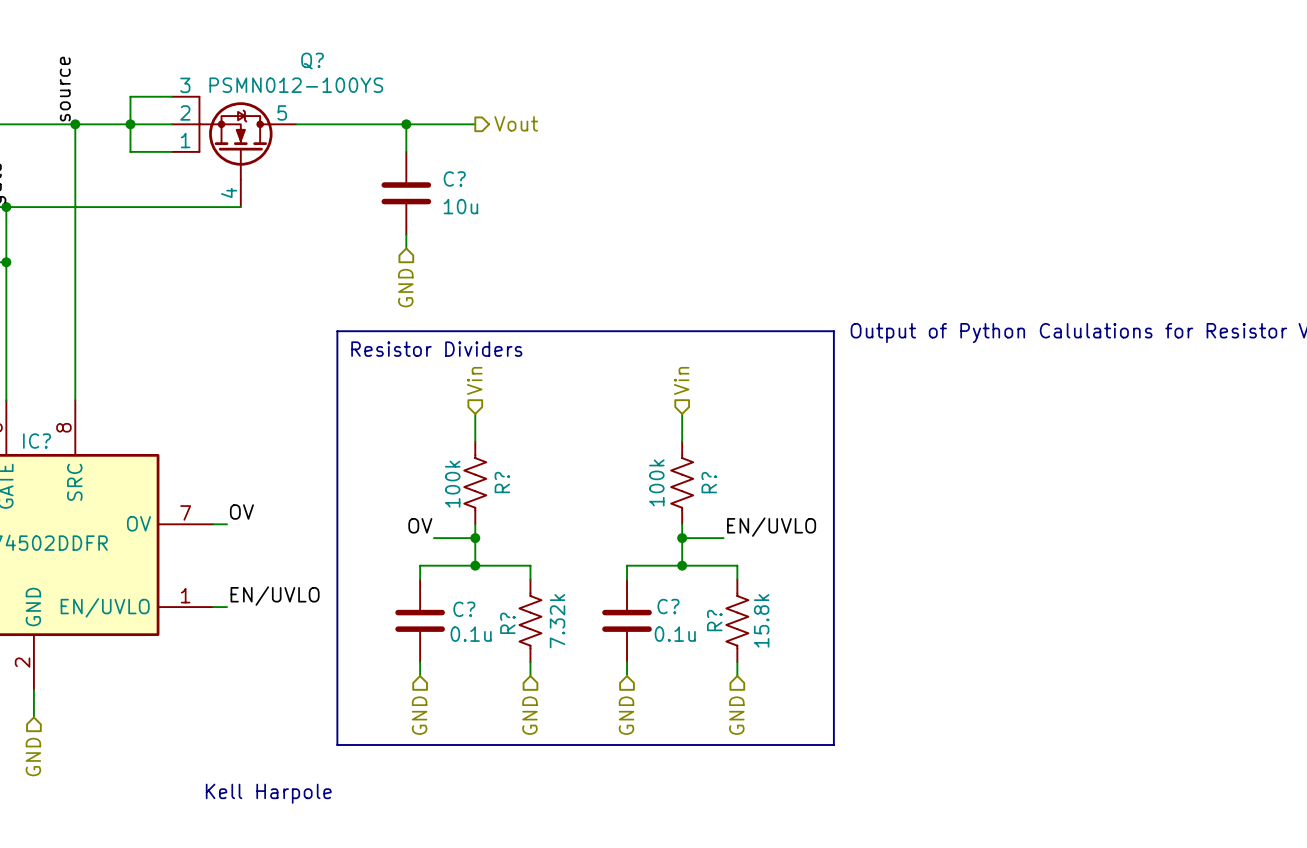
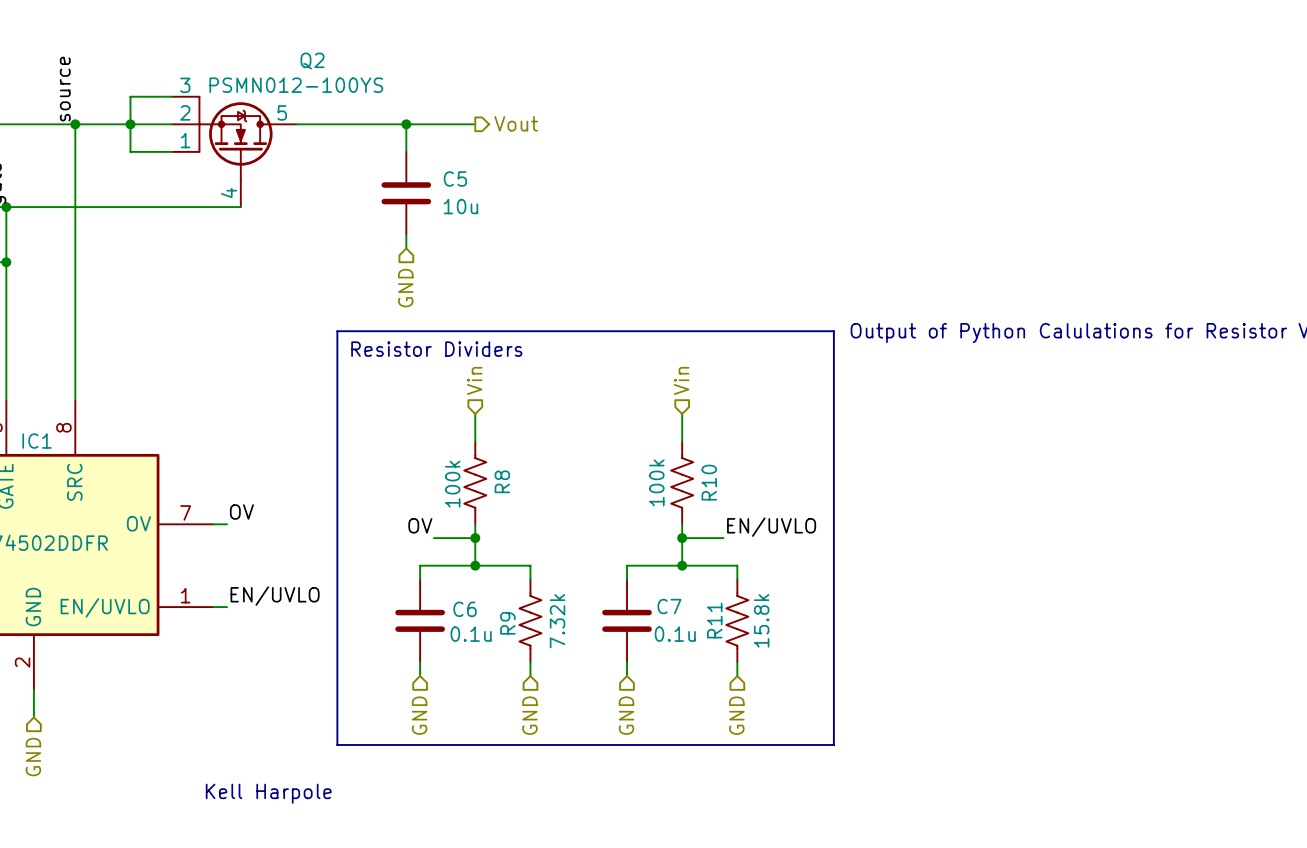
Q? name: Q? (312, 61) -> Q2 (312, 61)
C? name: C? (454, 178) -> C5 (455, 178)
IC? name: IC? (37, 441) -> IC1 (37, 441)
R? name: R? (502, 482) -> R8 (502, 481)
R? name: R? (709, 482) -> R10 (709, 482)
C? name: C? (668, 606) -> C7 (669, 606)
C? name: C? (464, 609) -> C6 (465, 609)
R? name: R? (714, 620) -> R11 (714, 620)
R? name: R? (507, 623) -> R9 (507, 623)

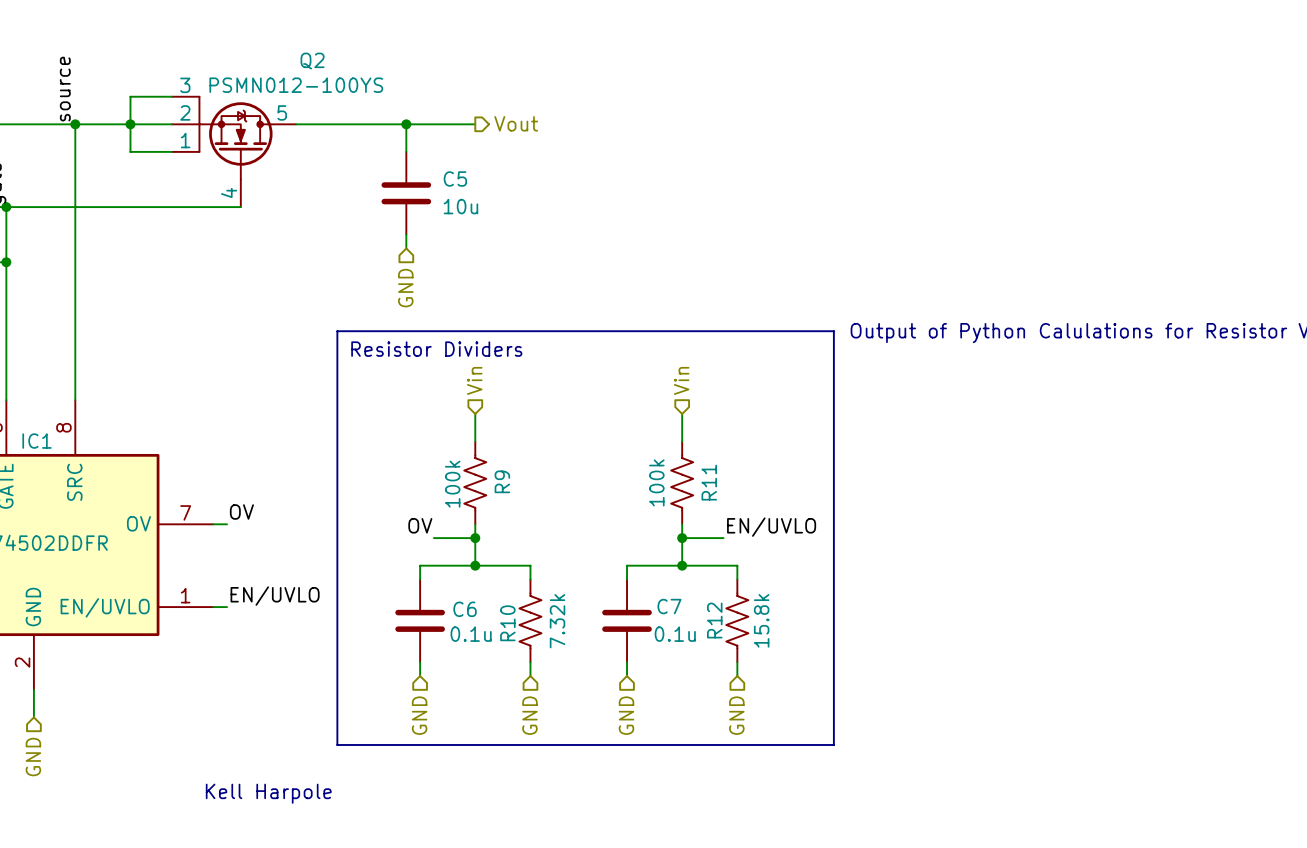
R8 name: R8 (502, 481) -> R9 (502, 481)
R10 name: R10 (709, 482) -> R11 (709, 482)
R11 name: R11 (714, 620) -> R12 (714, 620)
R9 name: R9 (507, 623) -> R10 (507, 623)

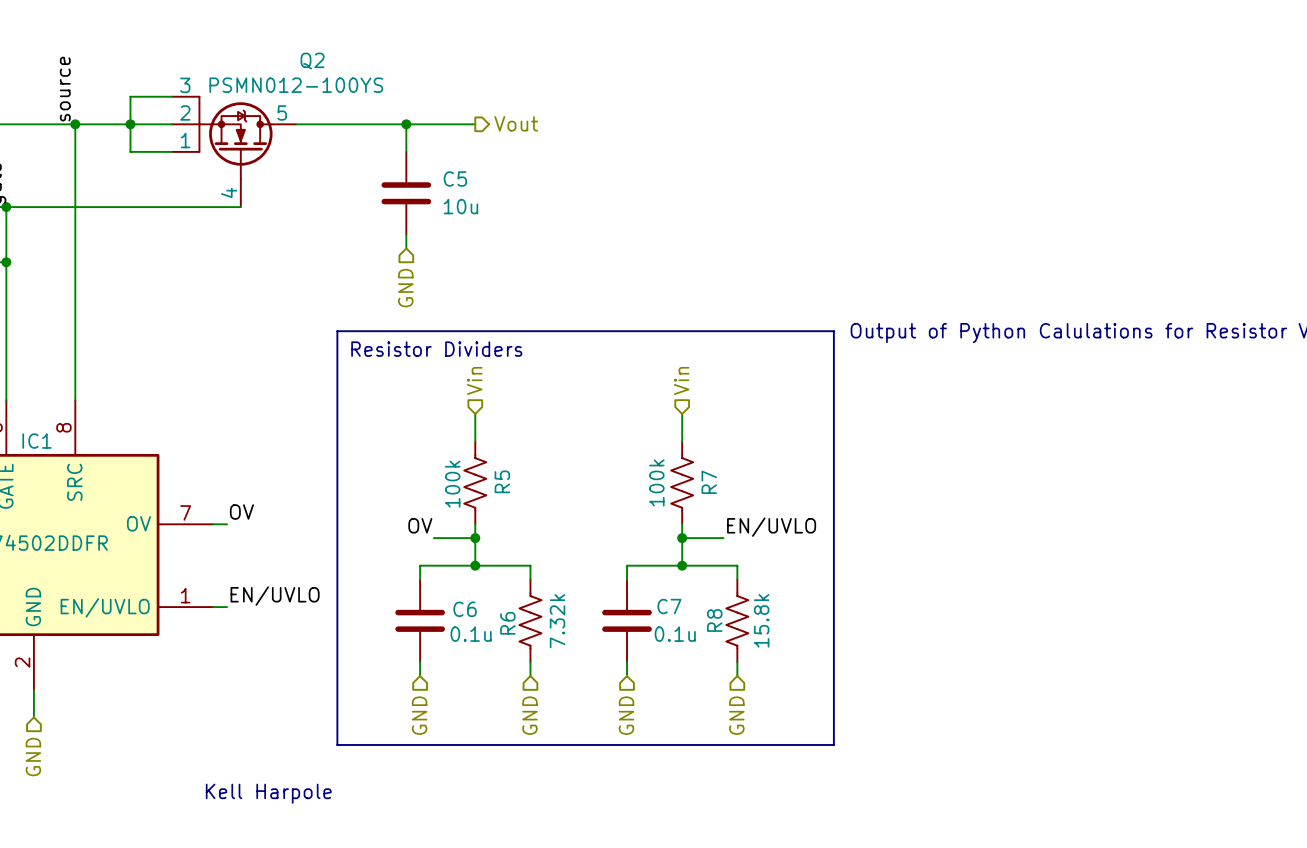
R9 name: R9 (502, 481) -> R5 (502, 481)
R11 name: R11 (709, 482) -> R7 (709, 482)
R12 name: R12 (714, 620) -> R8 (714, 620)
R10 name: R10 (507, 623) -> R6 (507, 623)

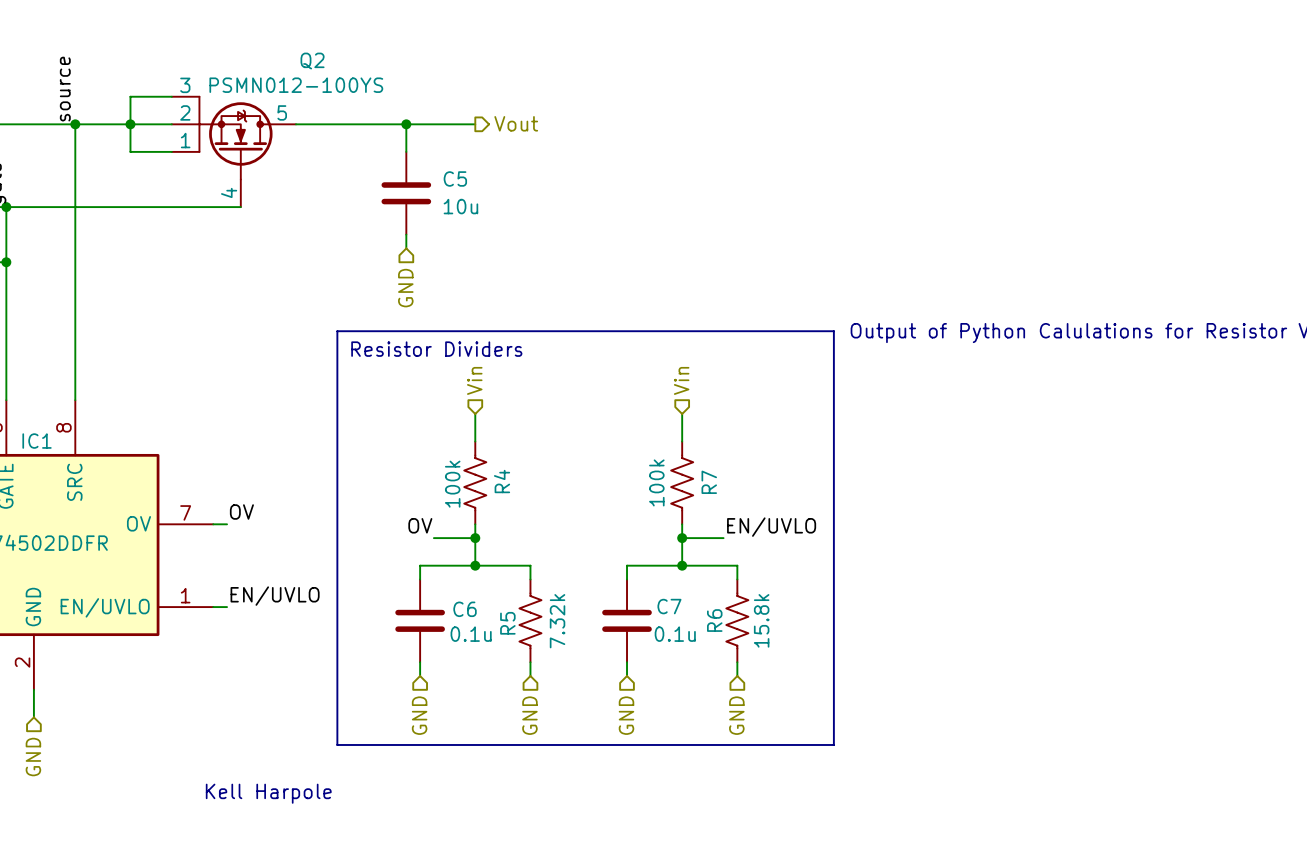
R5 name: R5 (502, 481) -> R4 (502, 481)
R8 name: R8 (714, 620) -> R6 (714, 620)
R6 name: R6 (507, 623) -> R5 (507, 623)

